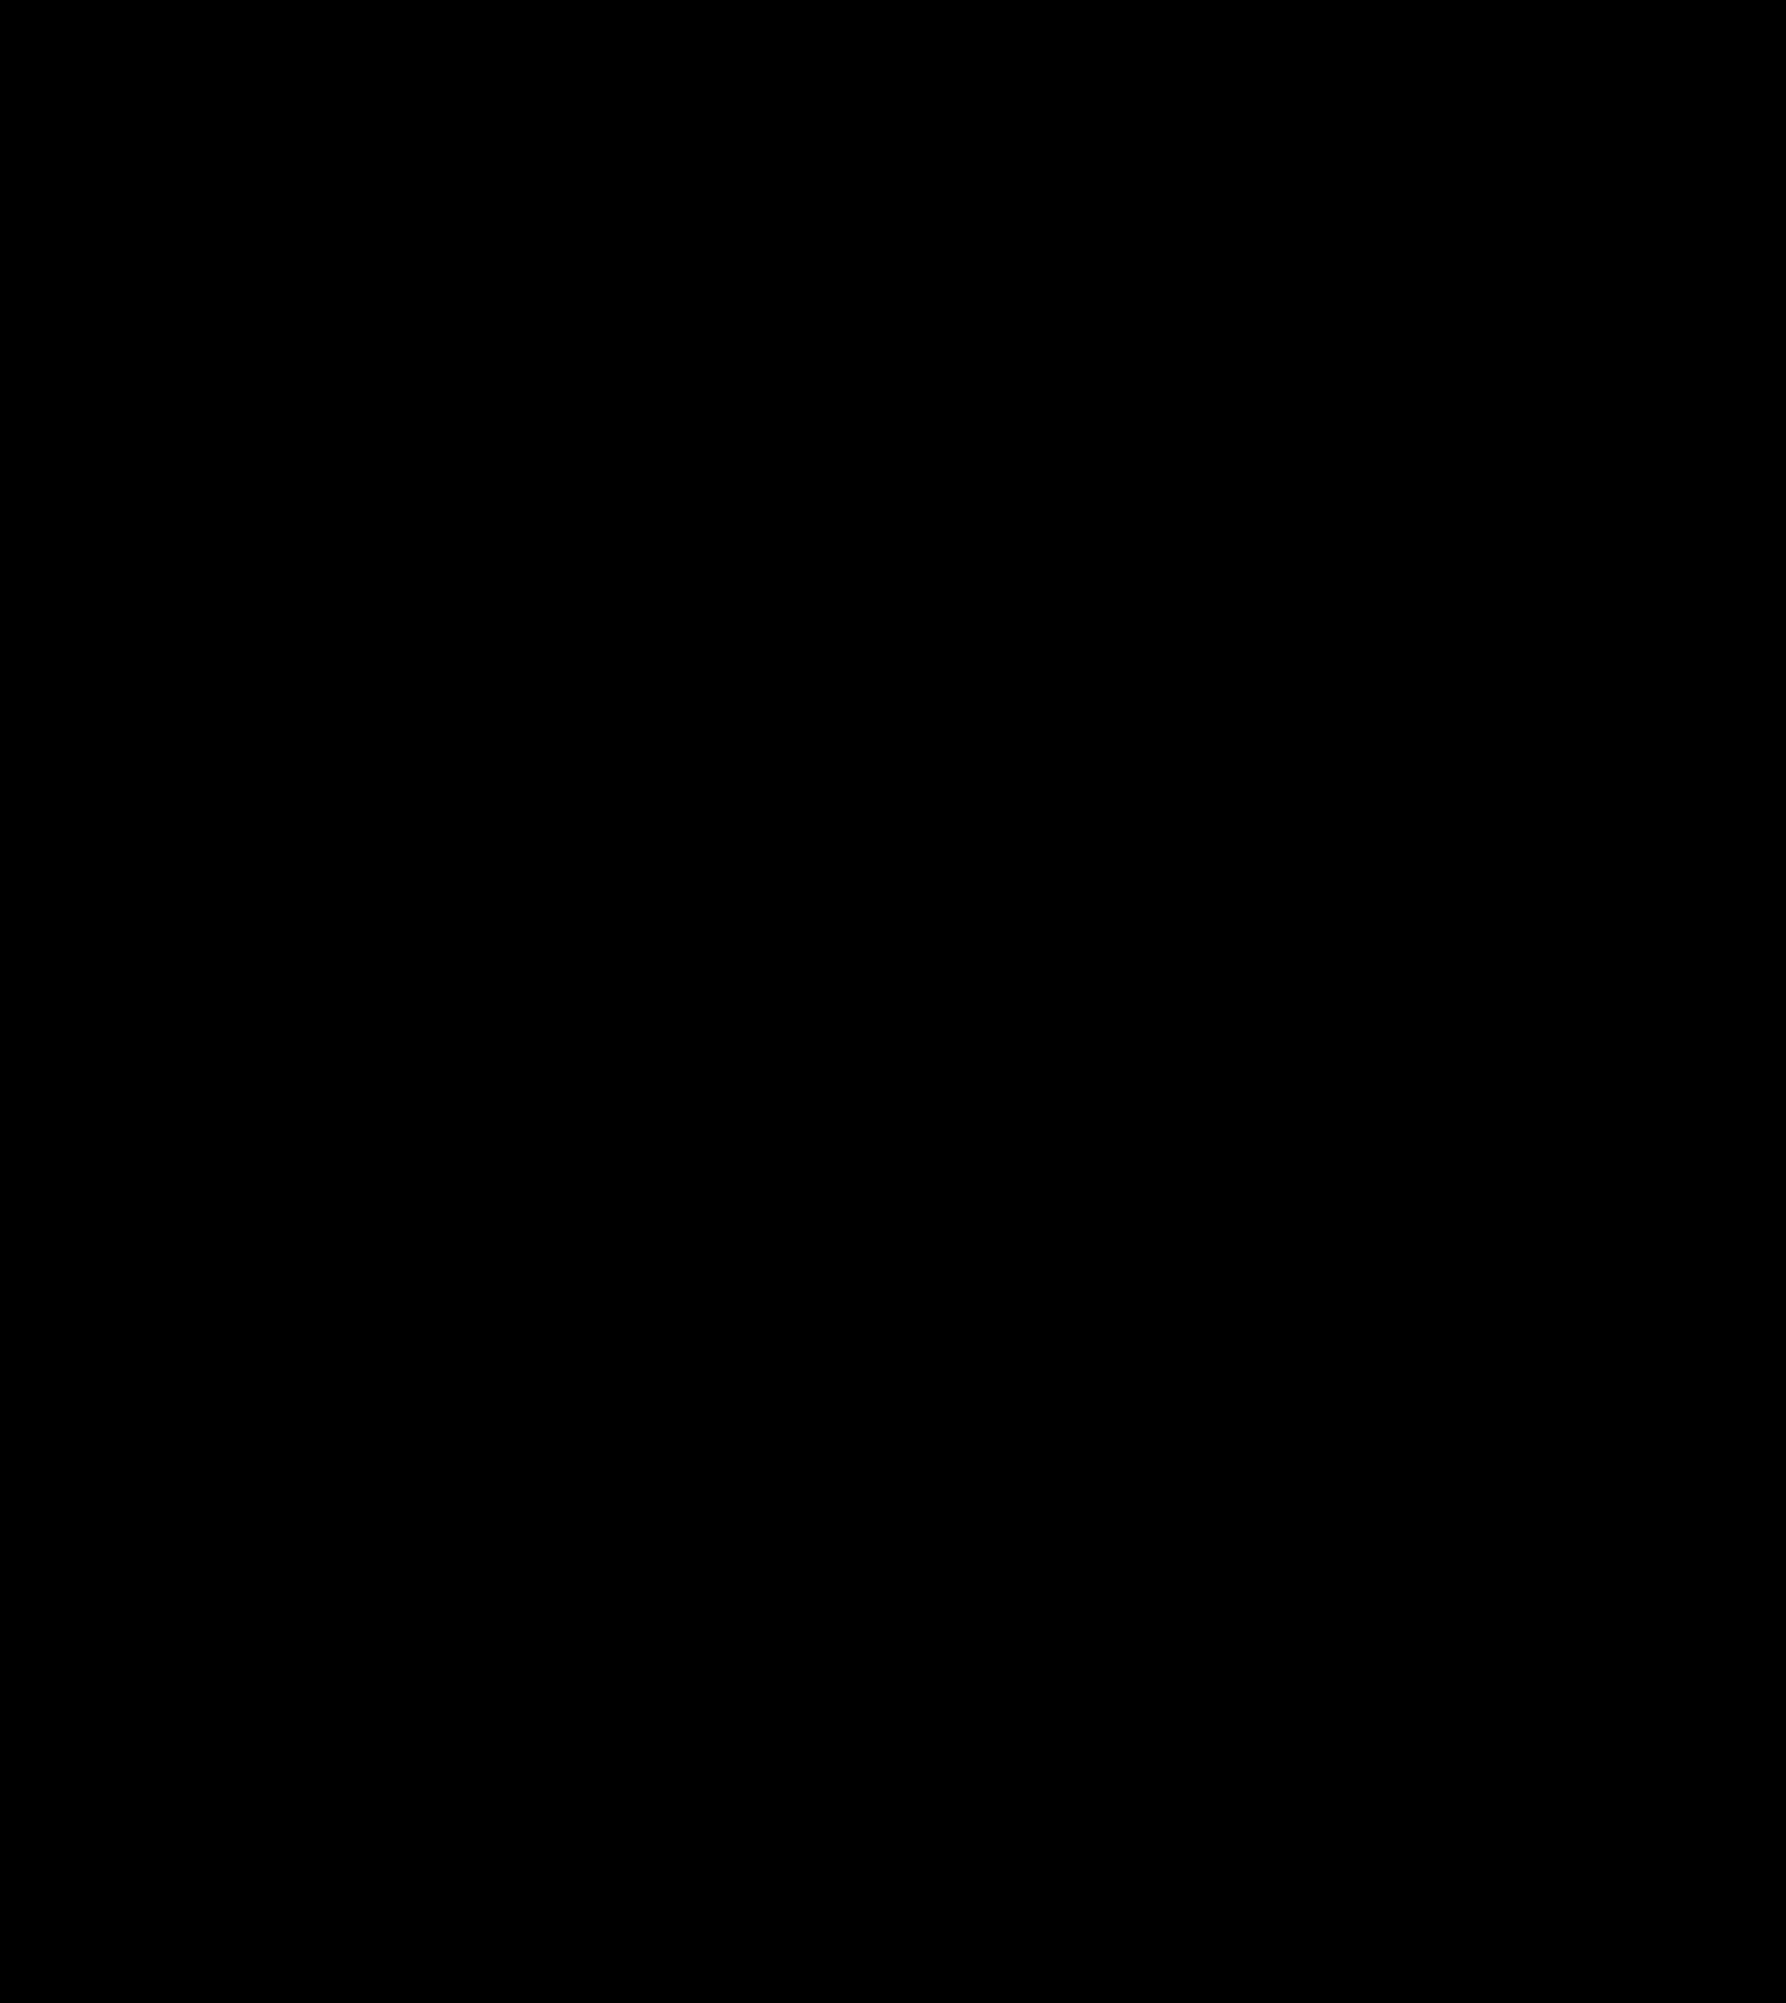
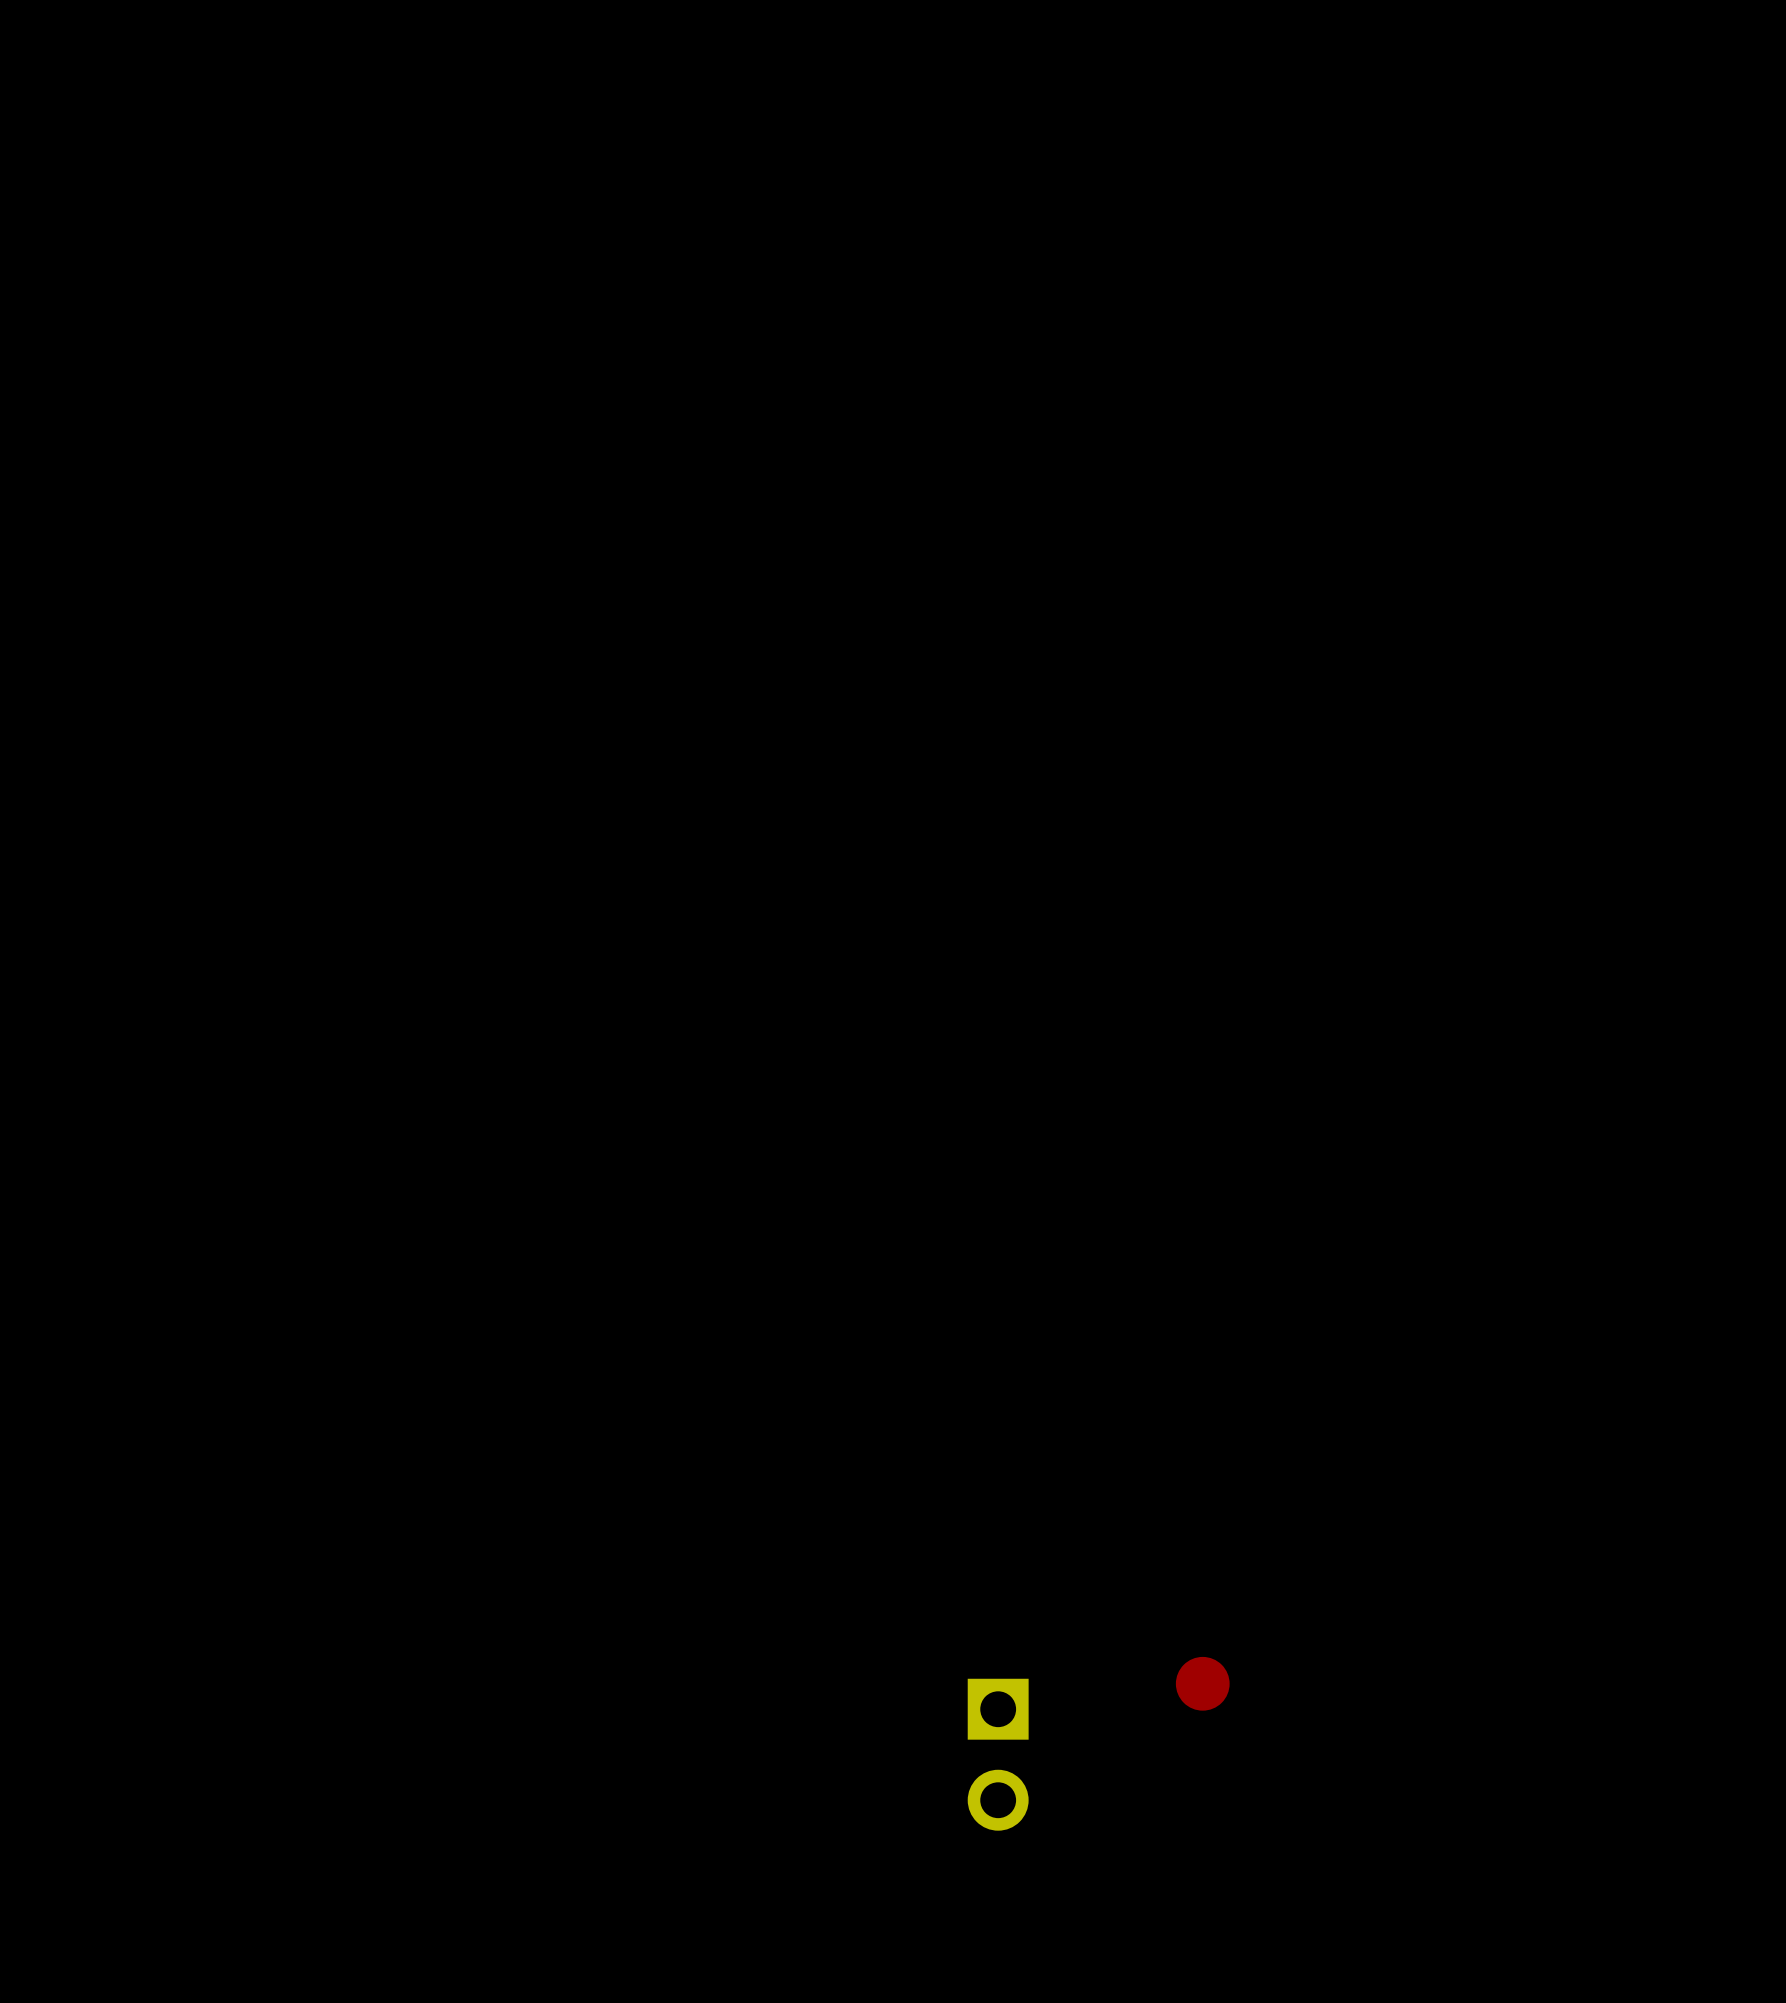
part: none -> (1202, 1683)
part: none -> (998, 1754)

